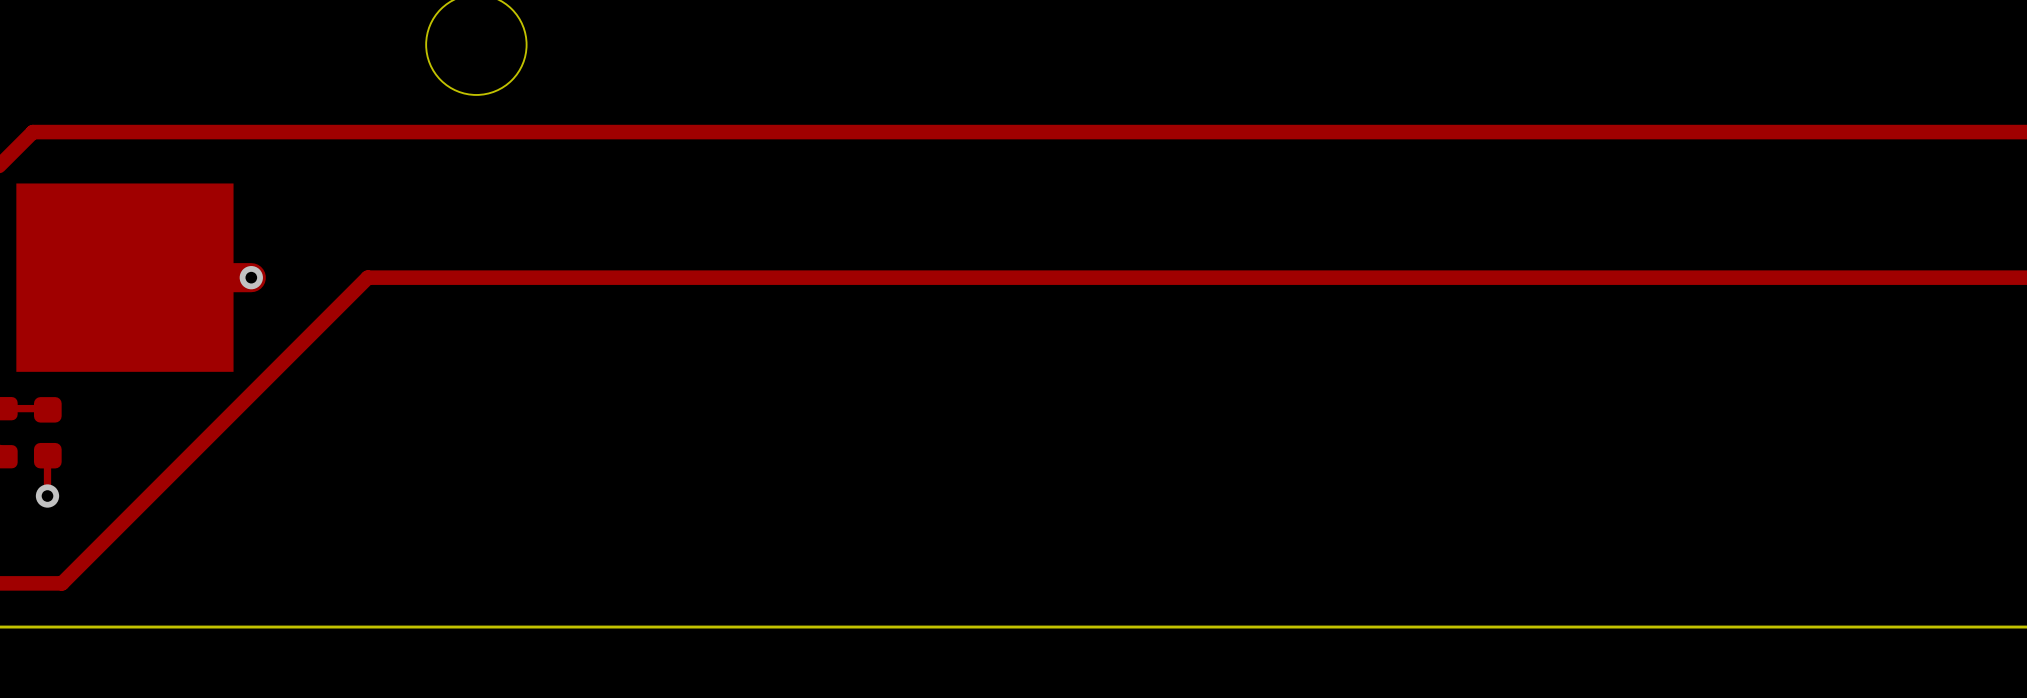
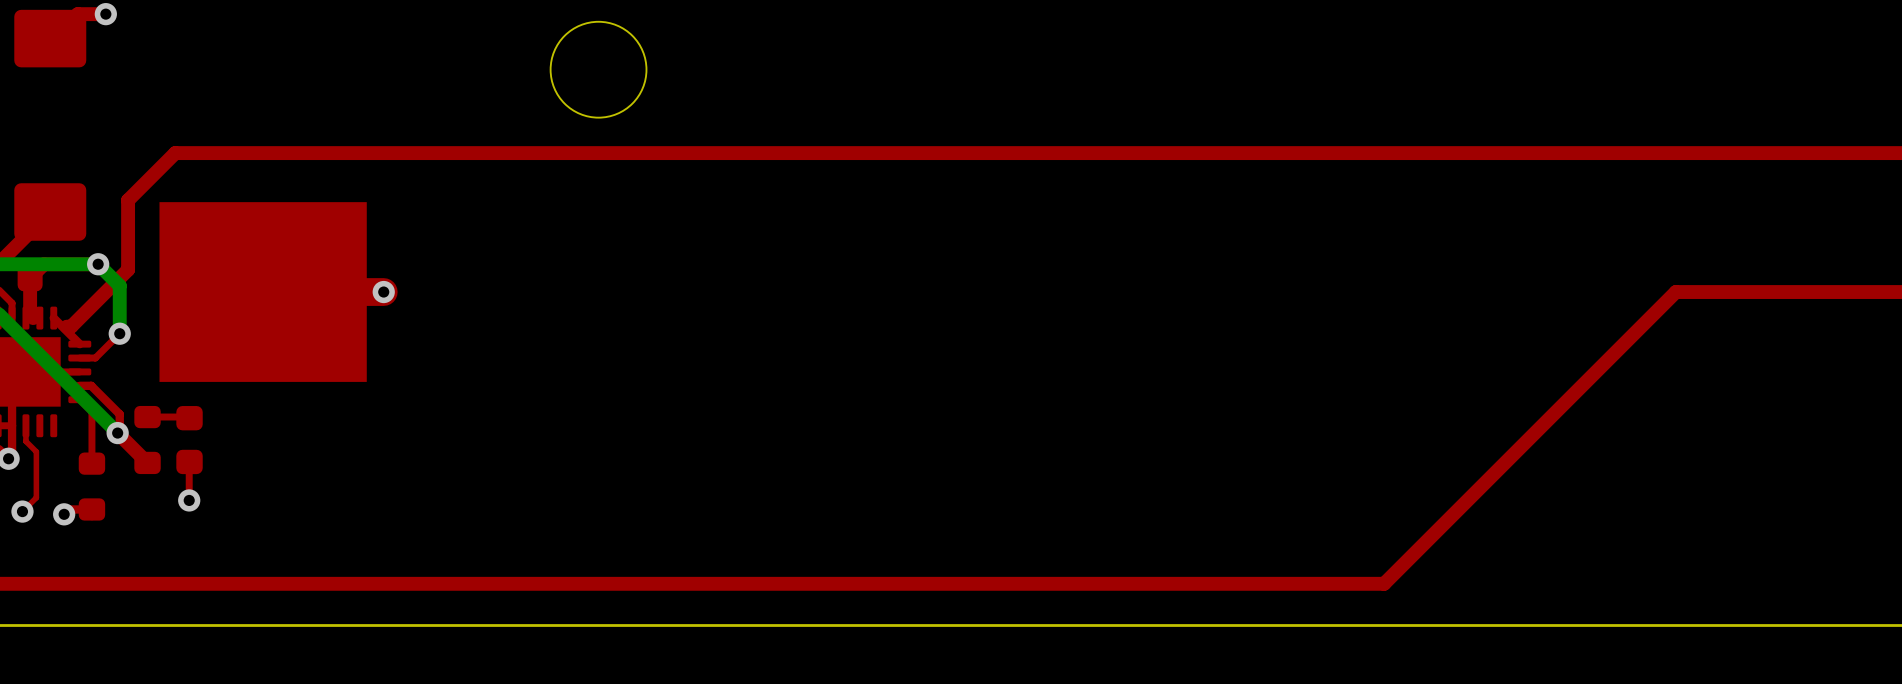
top track: (1605, 277) (367, 277) (62, 583) -> (1675, 292) (1384, 583) (203, 583)

